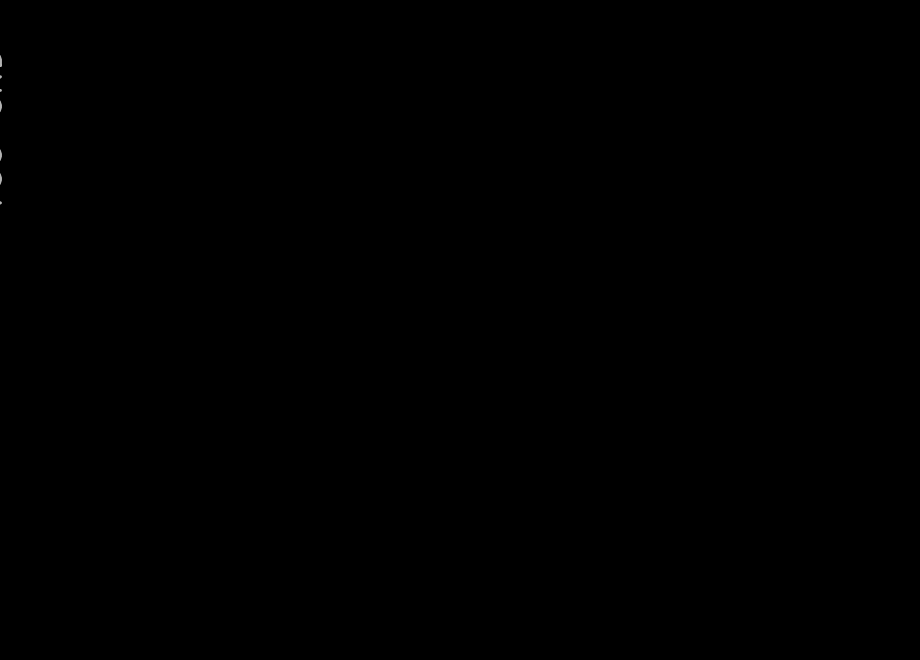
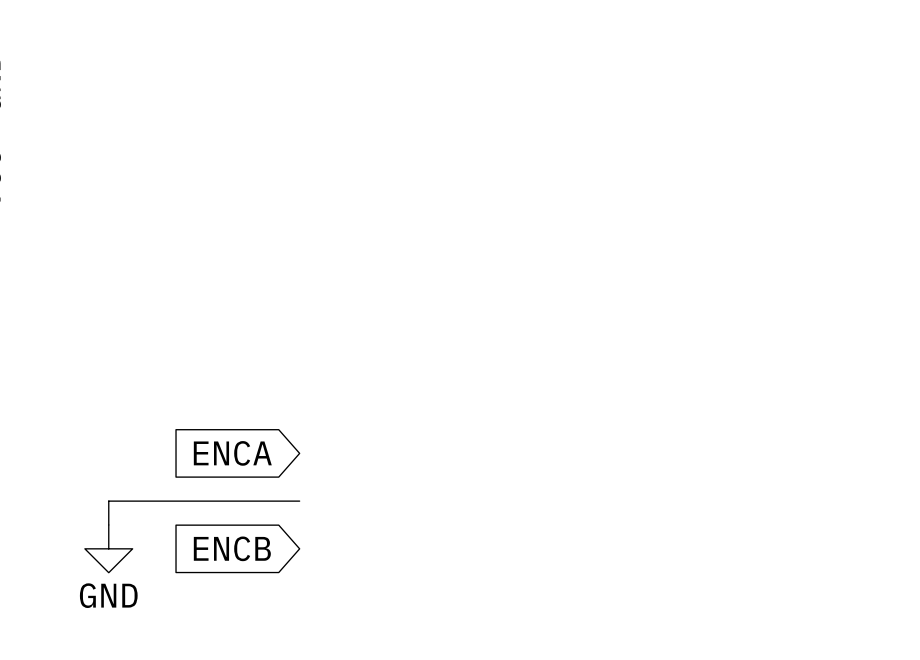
global label: none -> ENCA (232, 453)
wire: none -> (299, 501) (108, 501) (108, 524)
power symbol: none -> GND (108, 548)
global label: none -> ENCB (232, 548)

